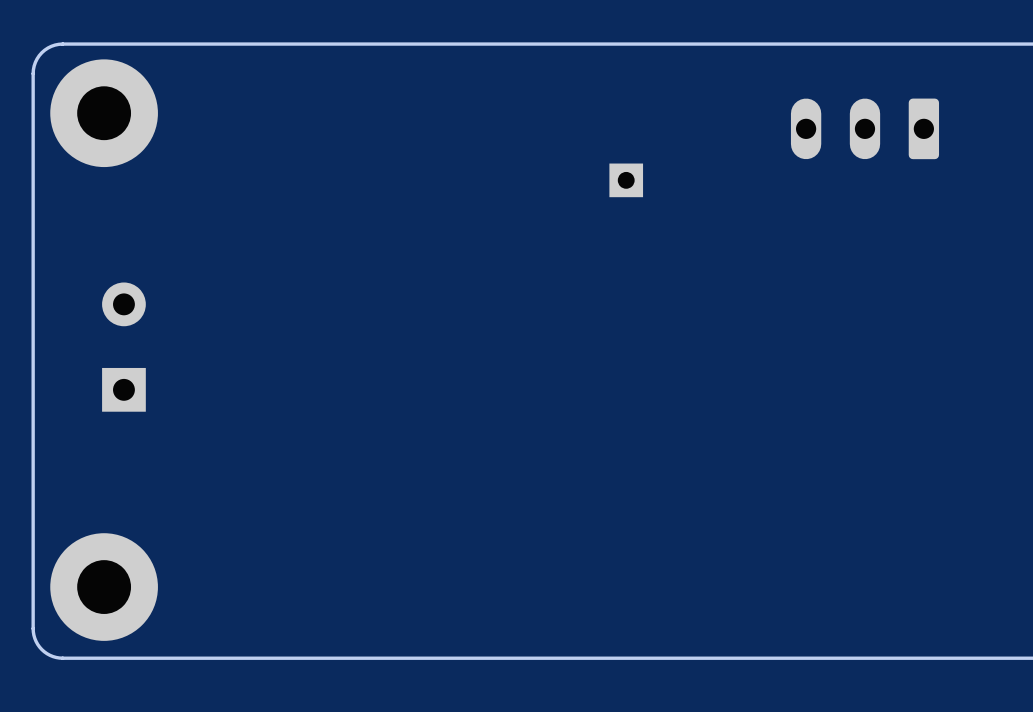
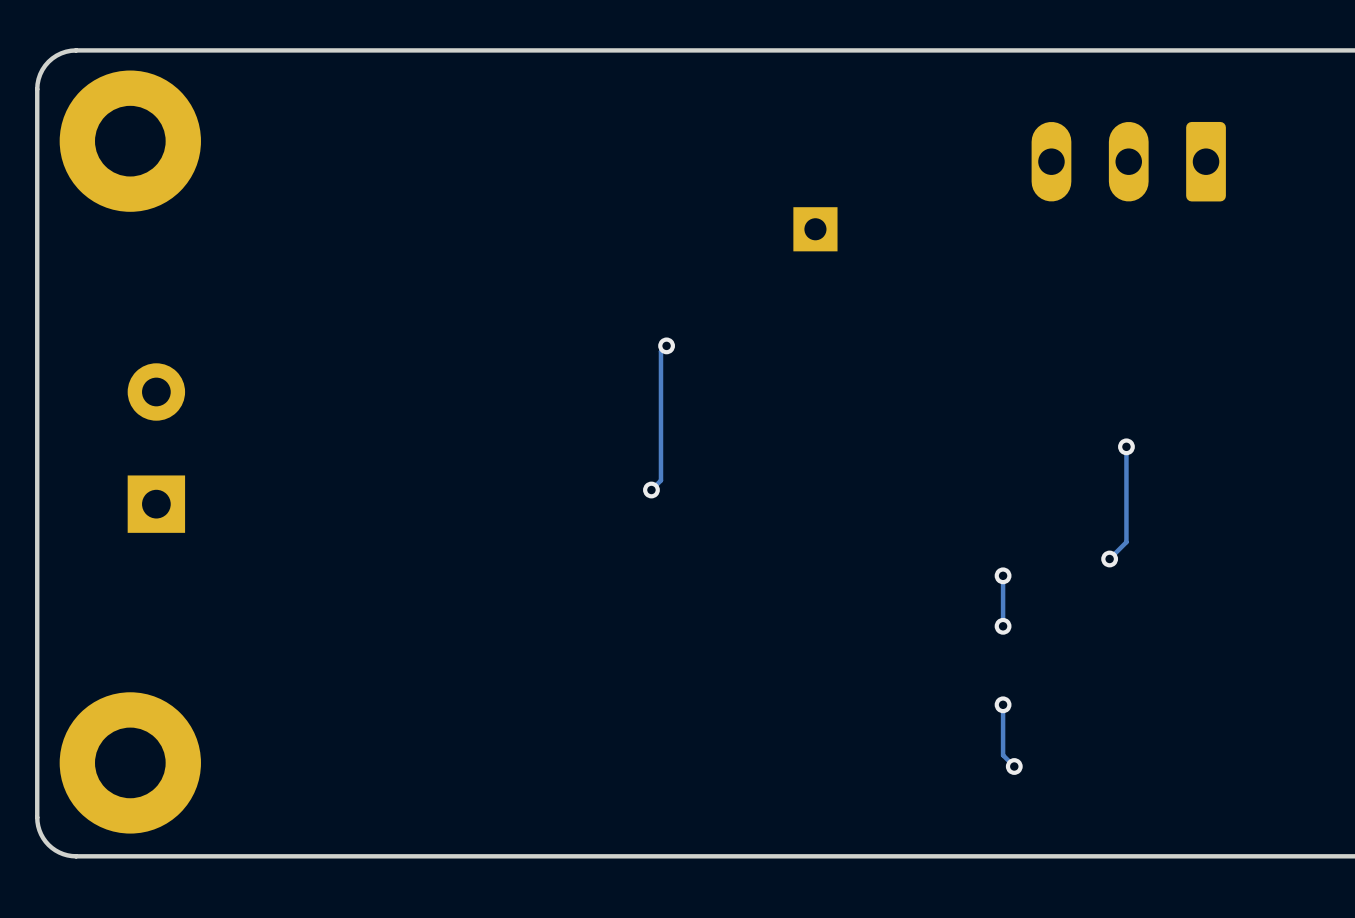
track: none -> (666, 345) (660, 351) (660, 480) (651, 490)
via: none -> (666, 345)
track: none -> (1126, 446) (1126, 542) (1109, 559)
via: none -> (1126, 446)
via: none -> (651, 490)
via: none -> (1109, 559)
track: none -> (1003, 575) (1003, 626)
via: none -> (1003, 575)
via: none -> (1003, 626)
track: none -> (1003, 704) (1003, 755) (1014, 766)
via: none -> (1003, 704)
via: none -> (1014, 766)

